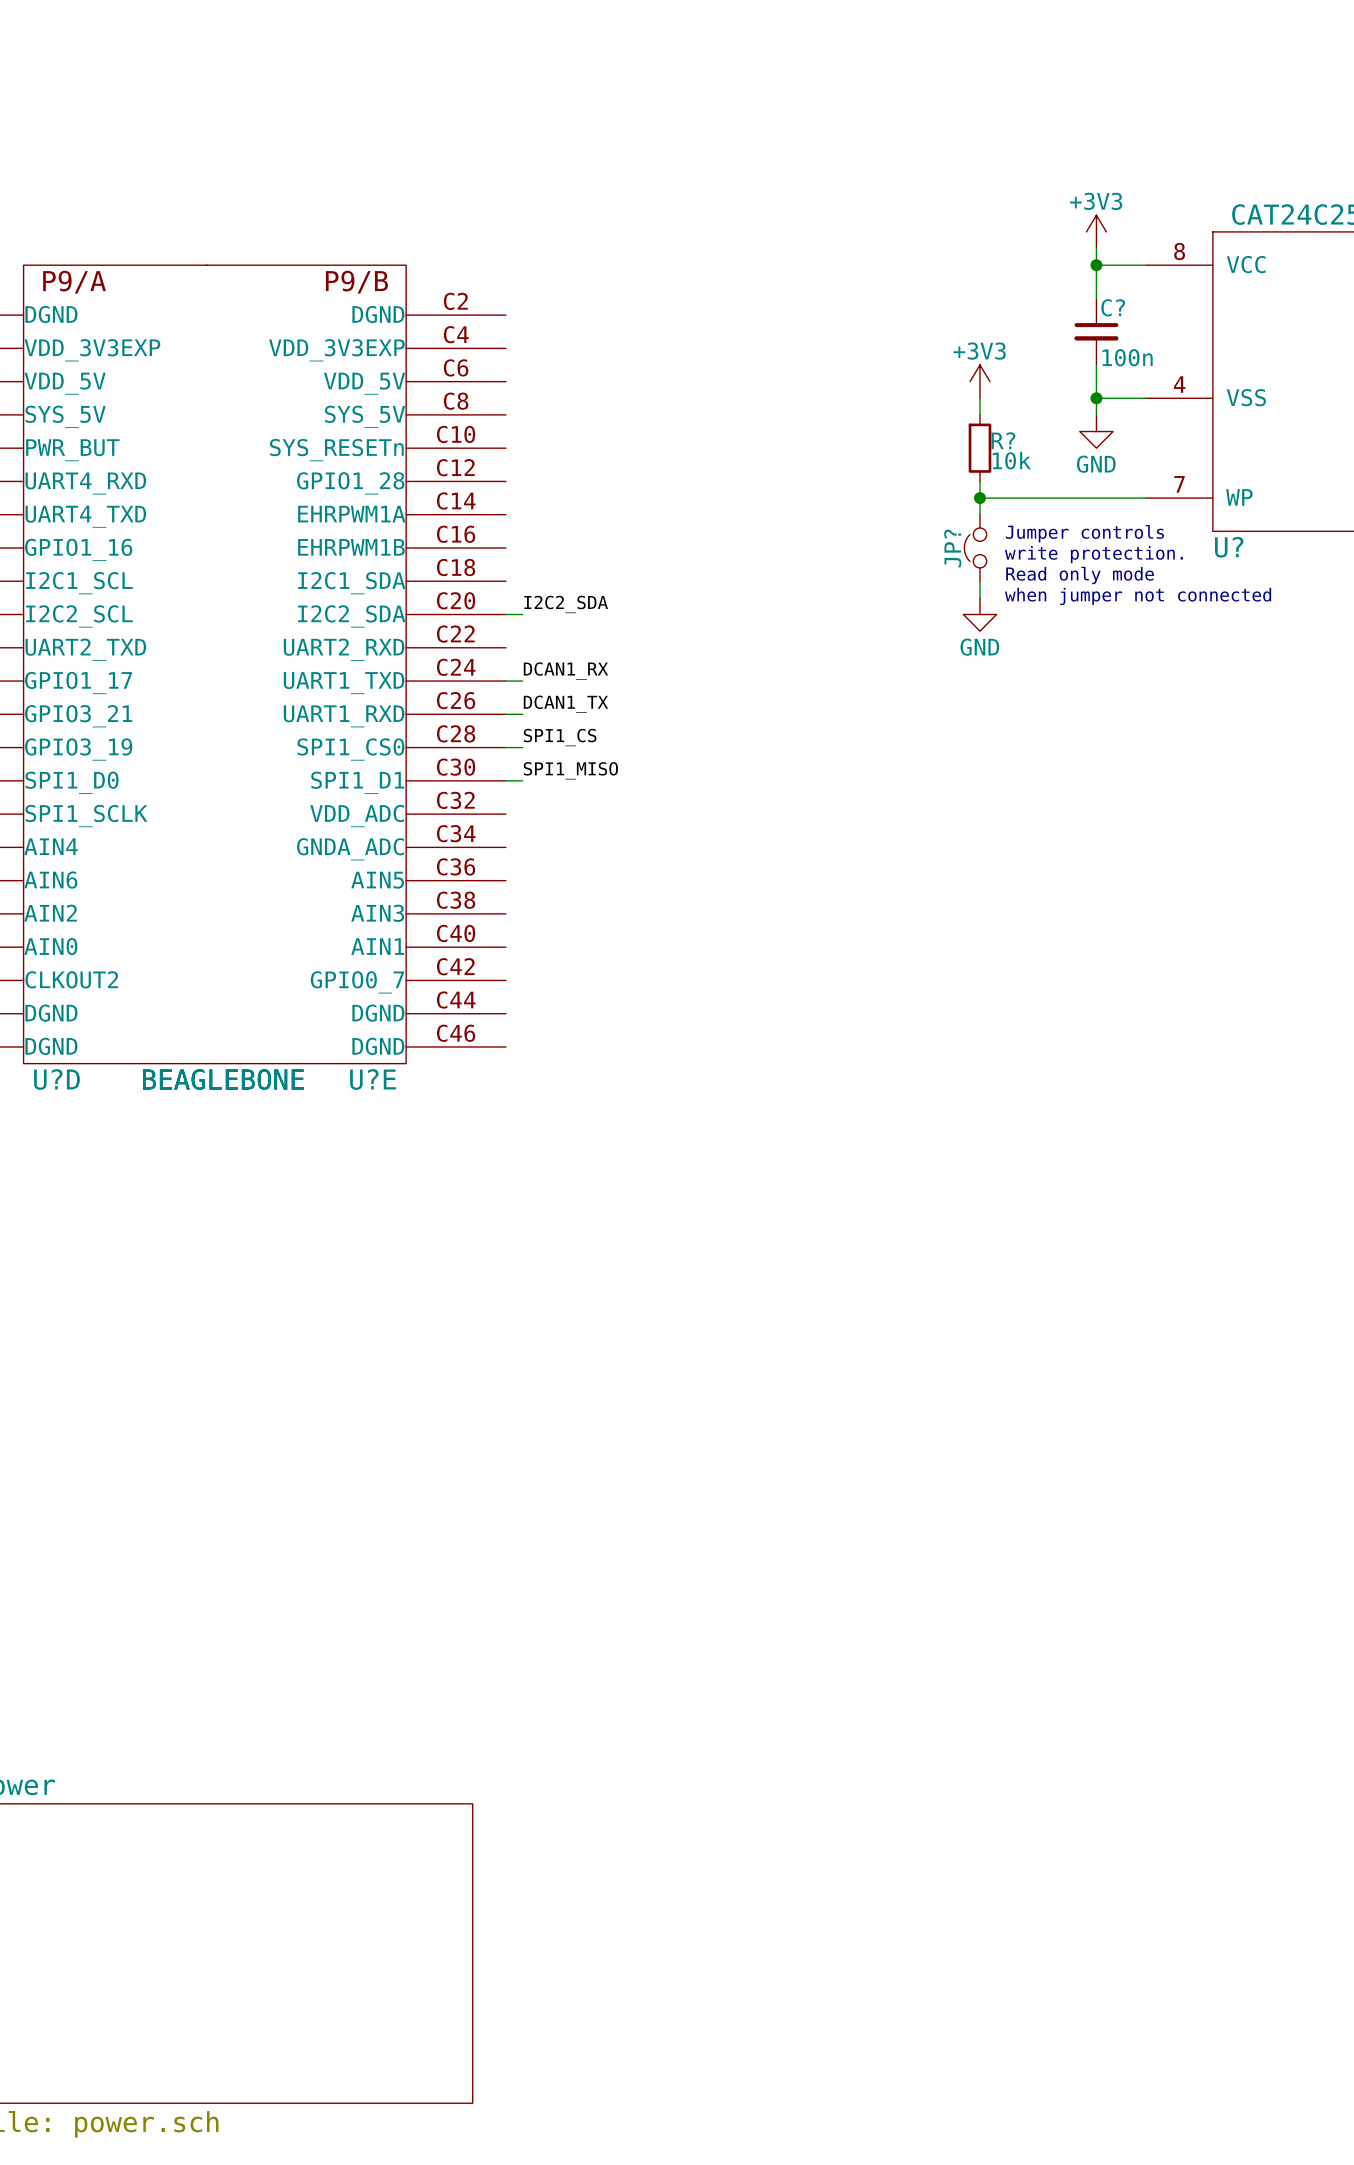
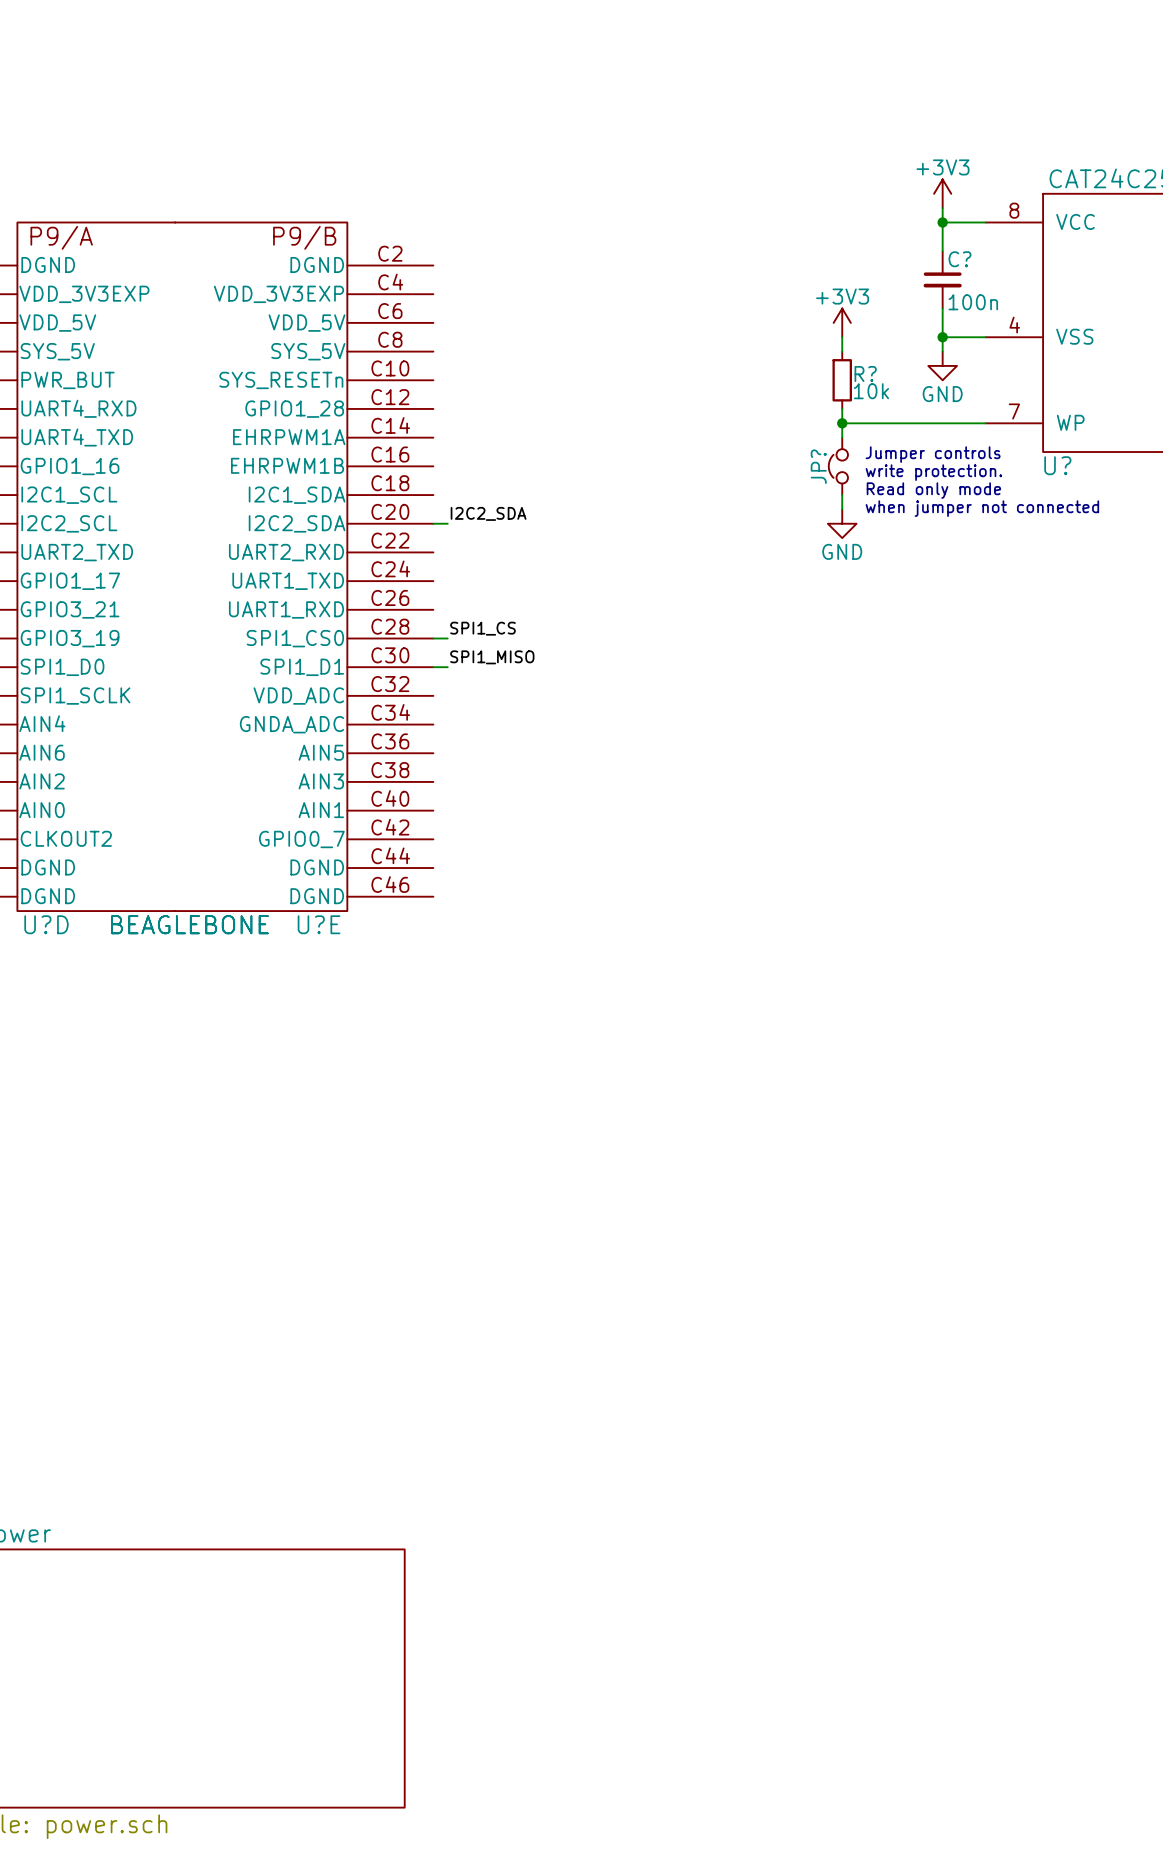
label: DCAN1_RX (565, 671) -> none
wire: (505, 681) (522, 681) -> none
label: DCAN1_TX (565, 704) -> none
wire: (505, 714) (522, 714) -> none

